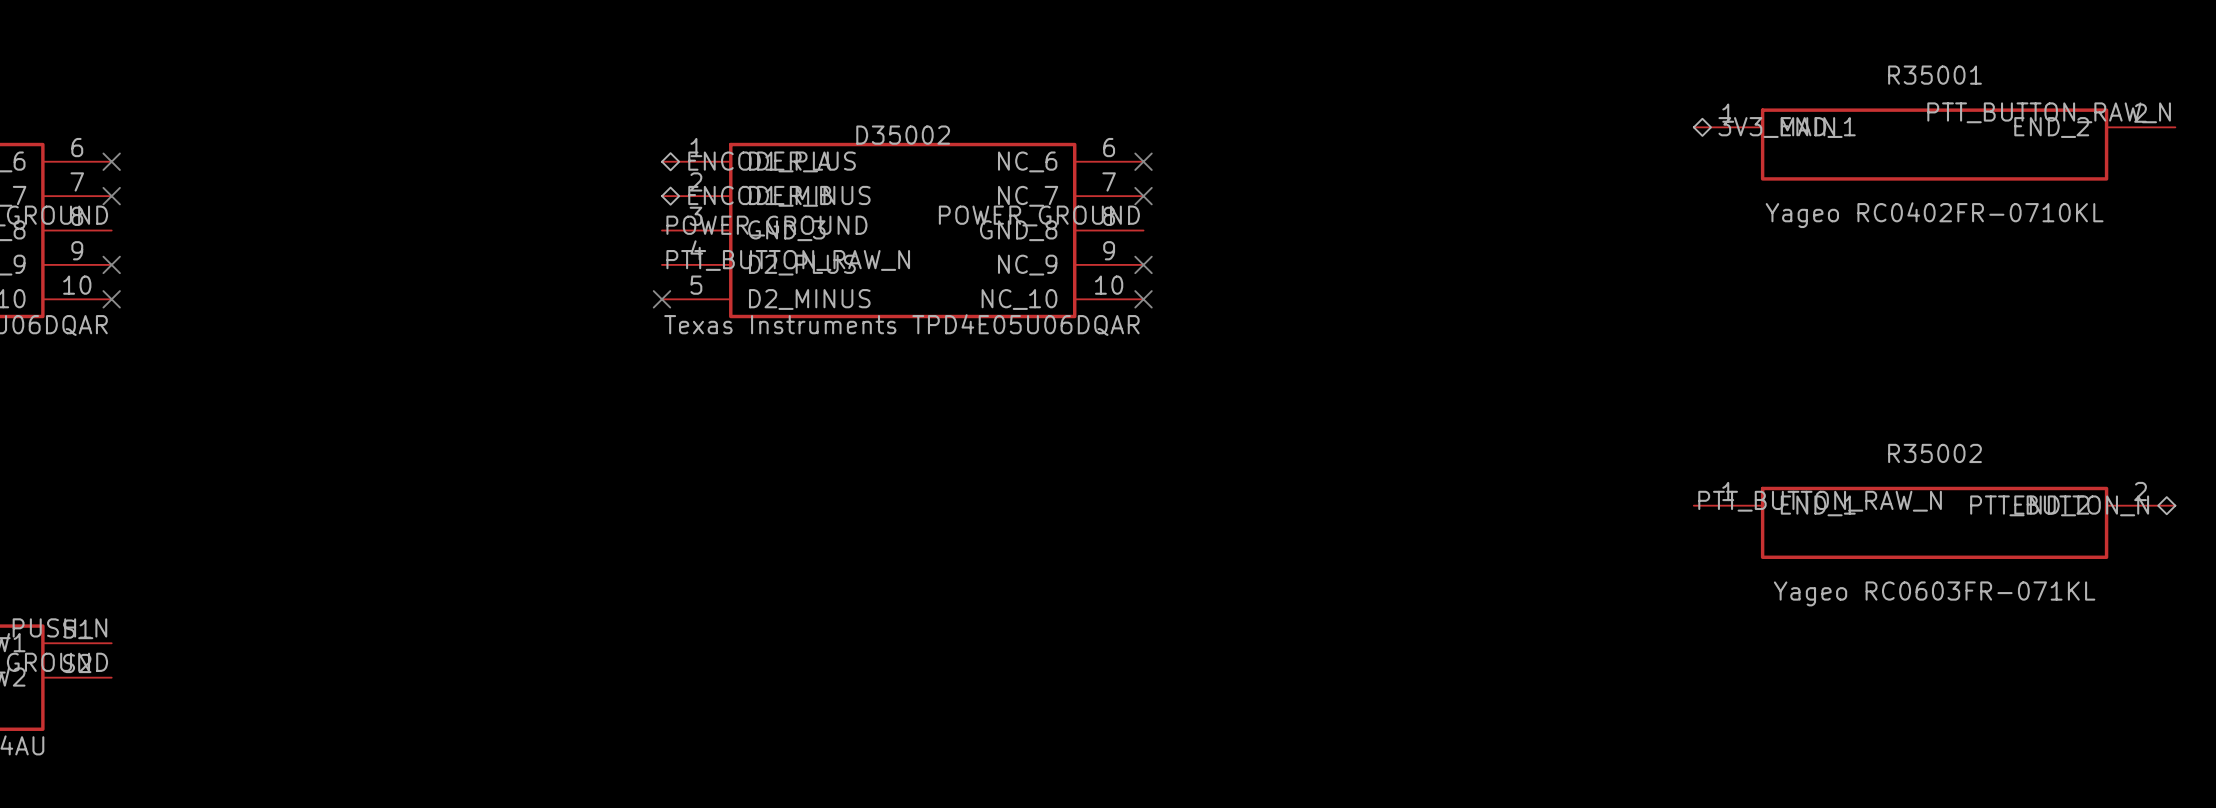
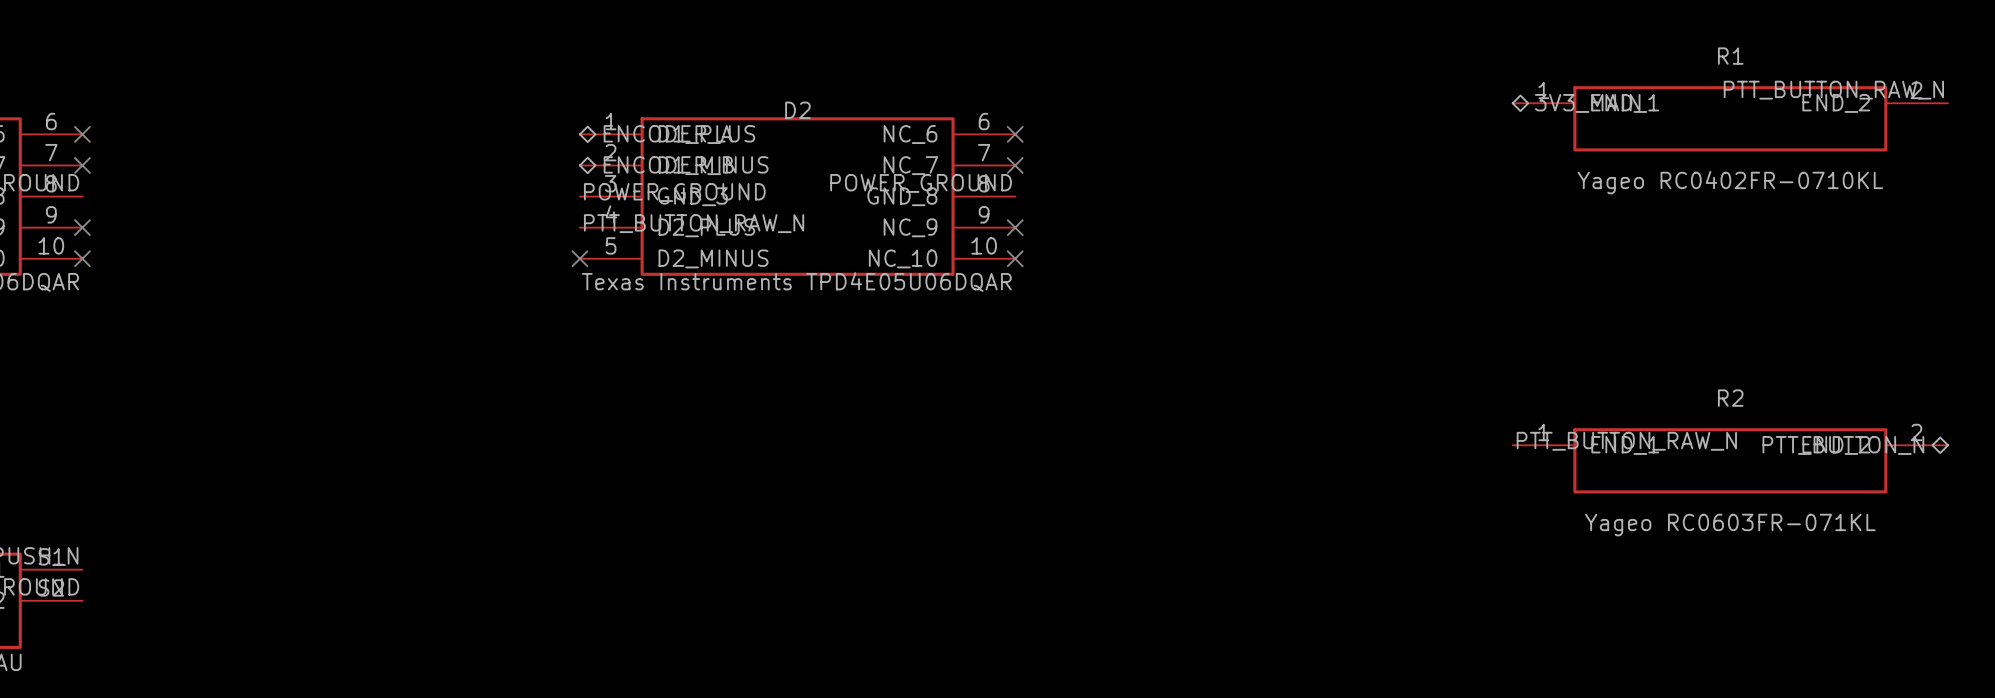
R35001 name: R35001 (1935, 75) -> R1 (1730, 56)
D35002 name: D35002 (903, 135) -> D2 (797, 110)
R35002 name: R35002 (1935, 453) -> R2 (1730, 398)

